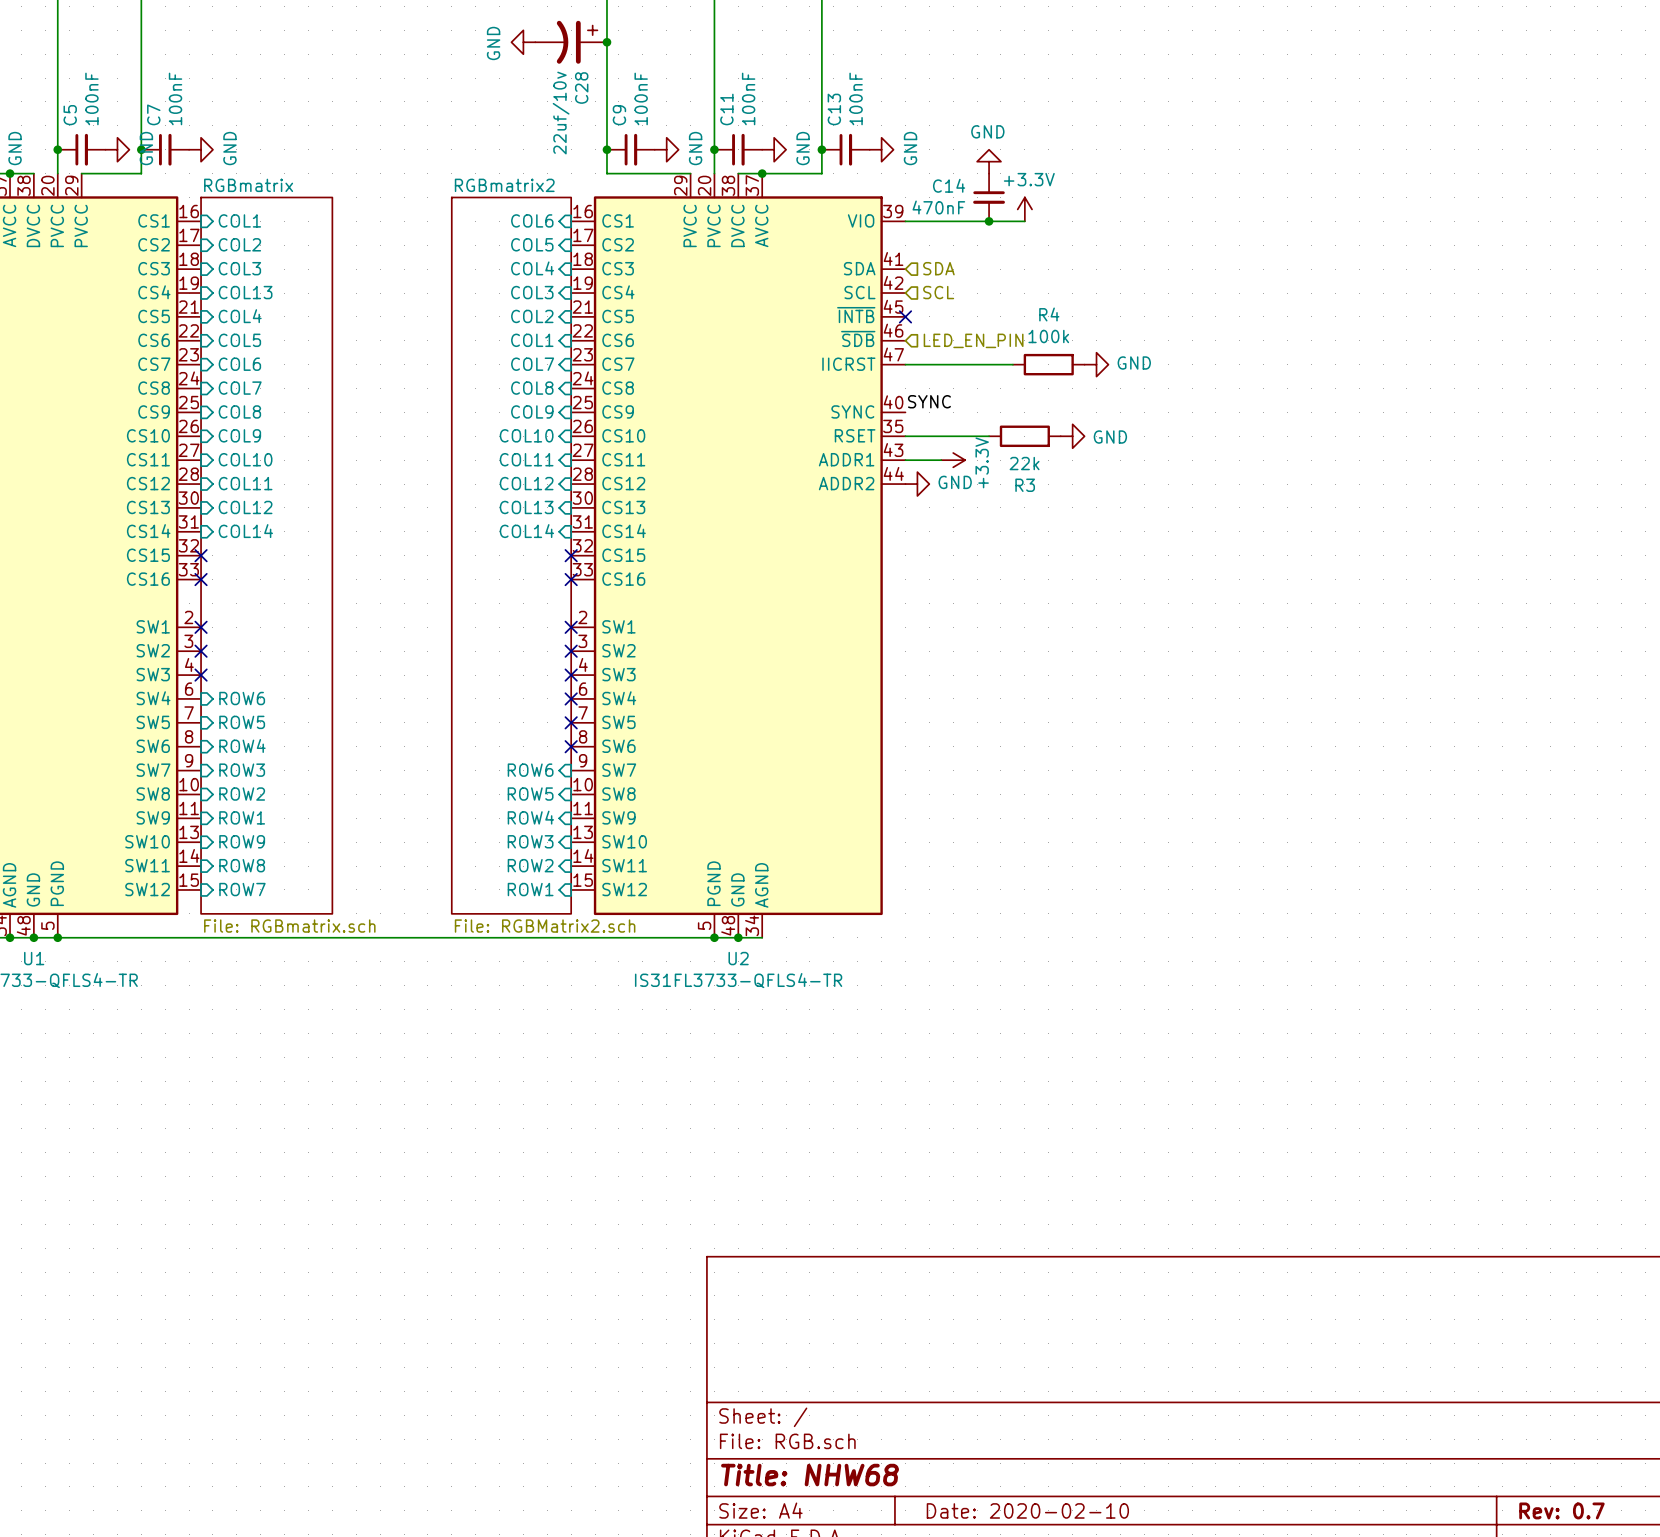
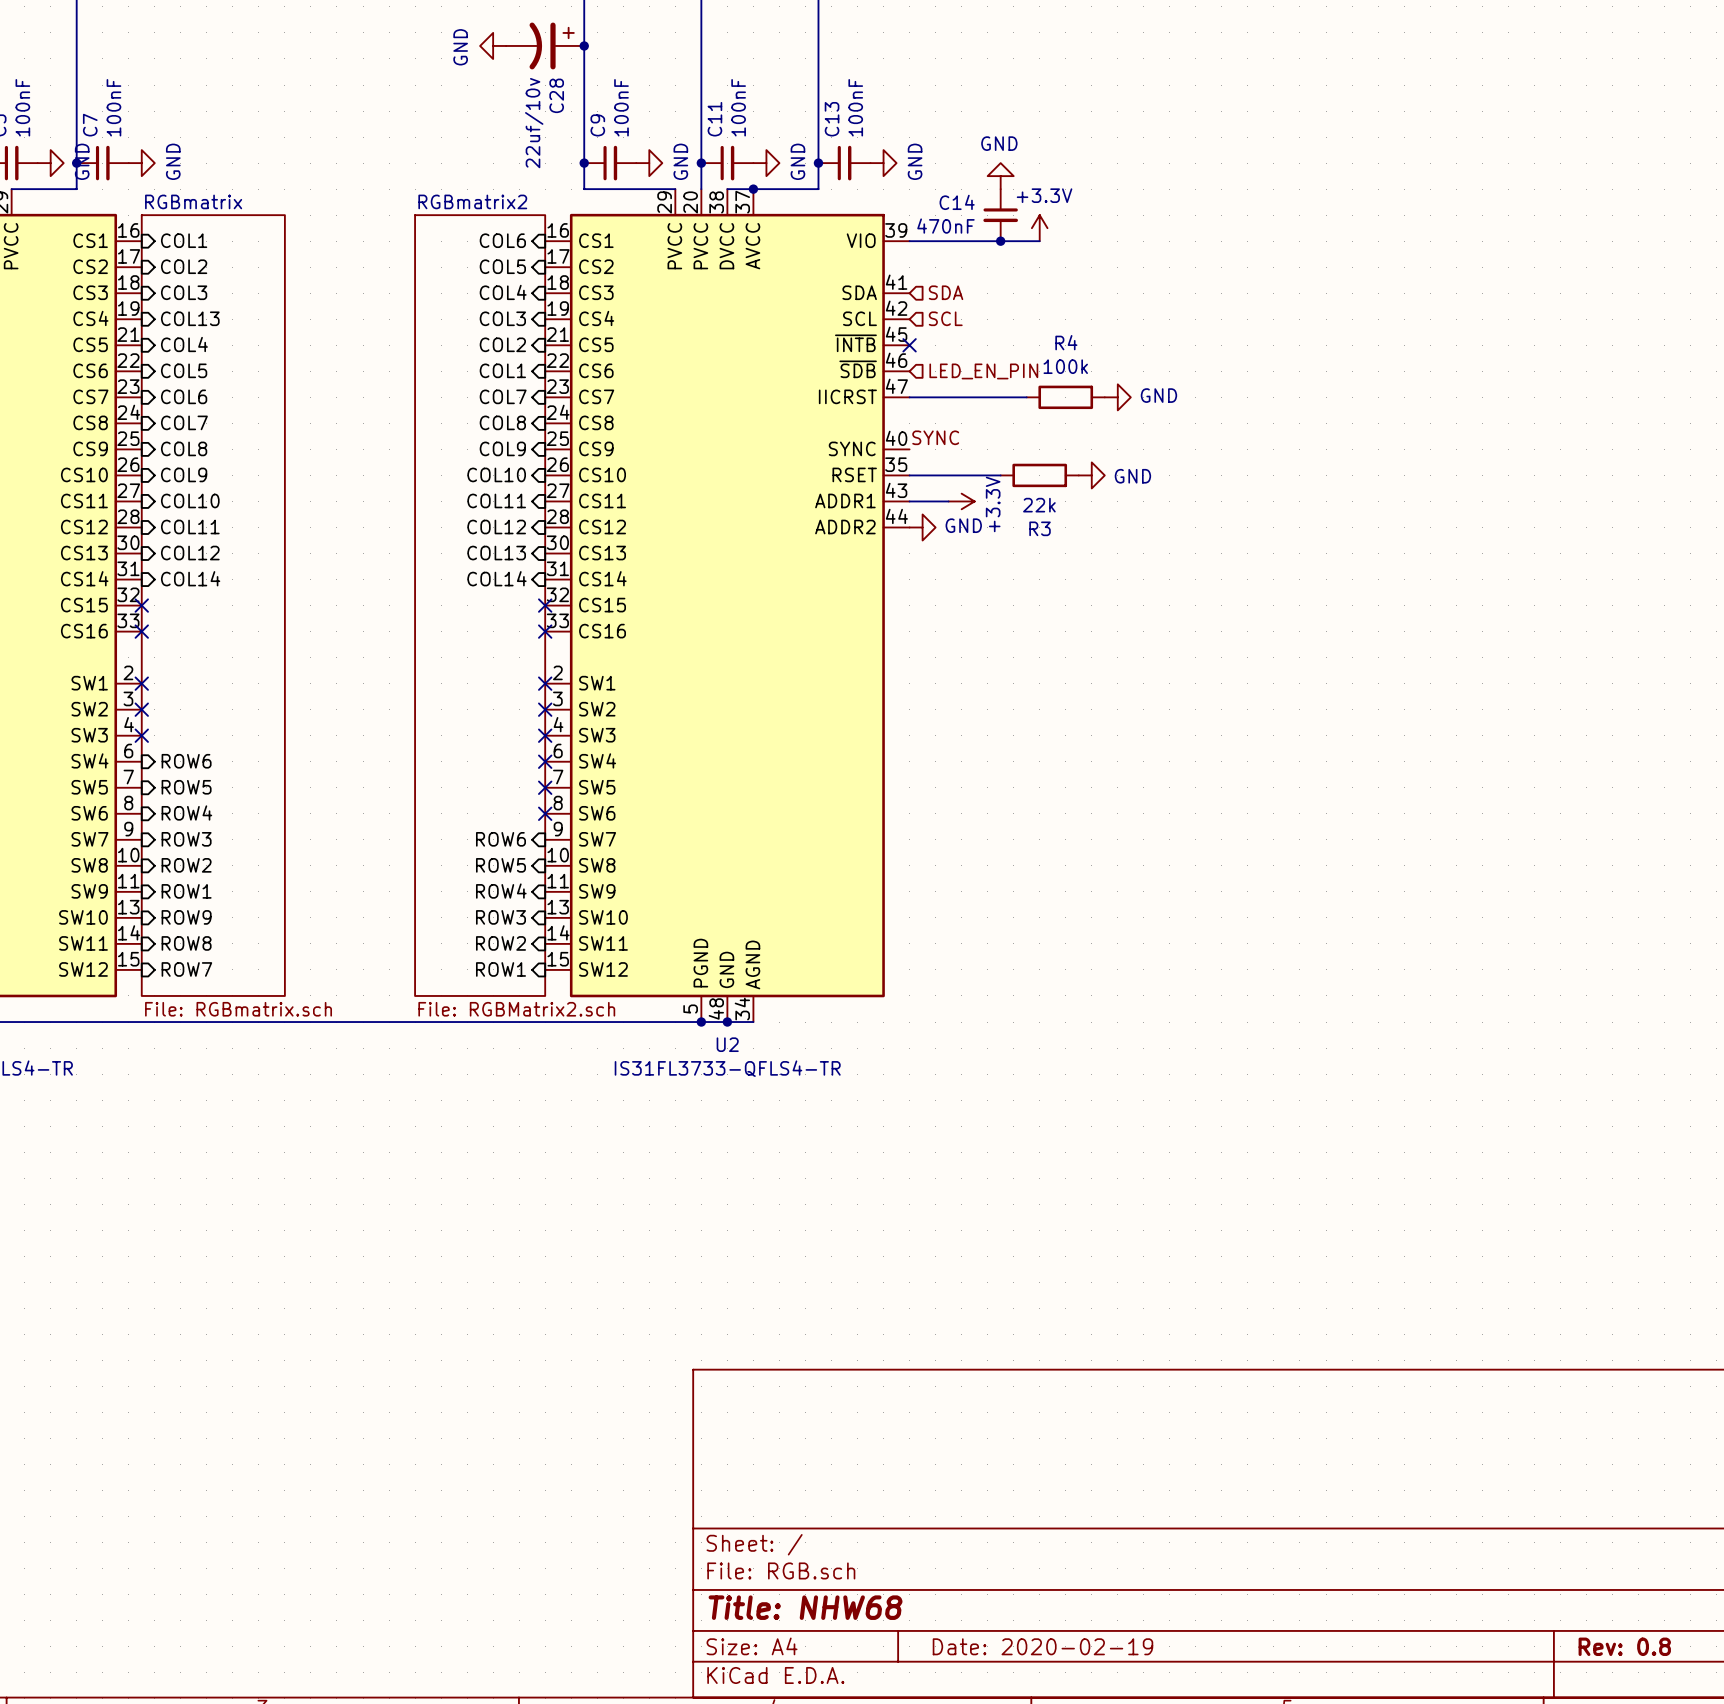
title block: Date: 2020-02-10 (1027, 1510) -> Date: 2020-02-19 (1042, 1646)
title block: Rev: 0.7 (1561, 1510) -> Rev: 0.8 (1624, 1646)

